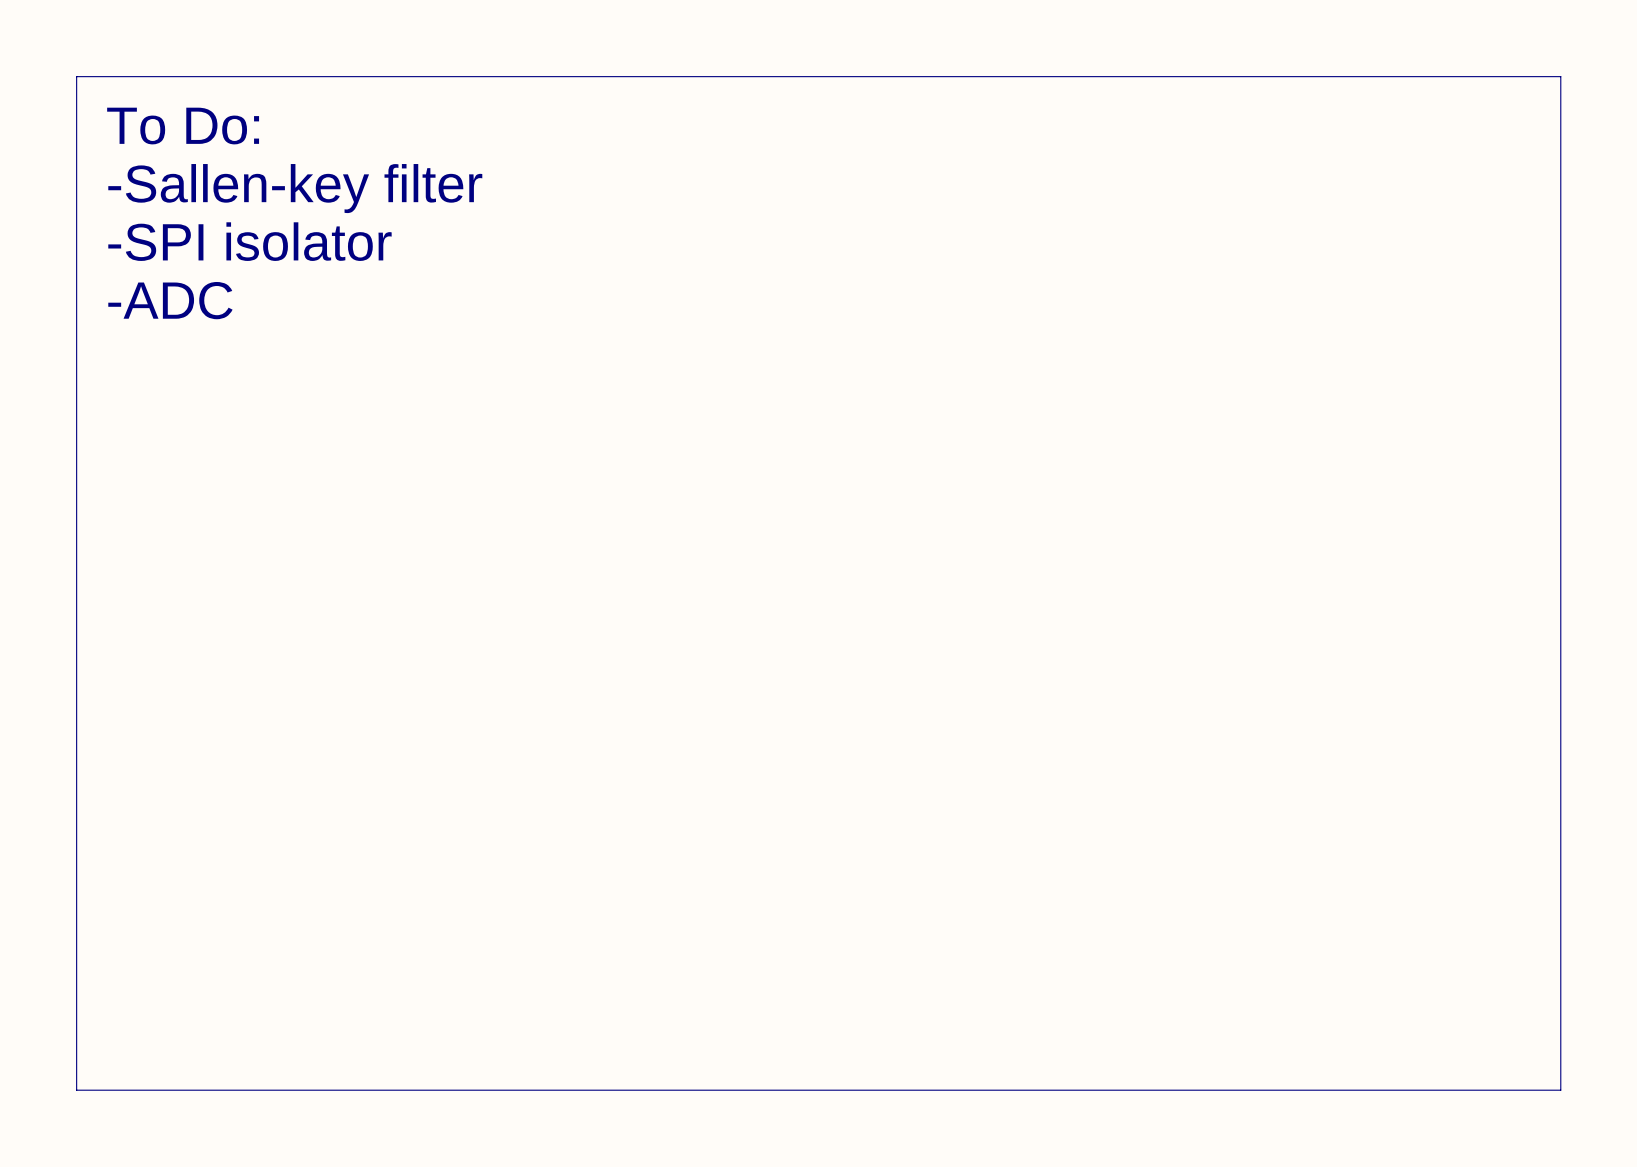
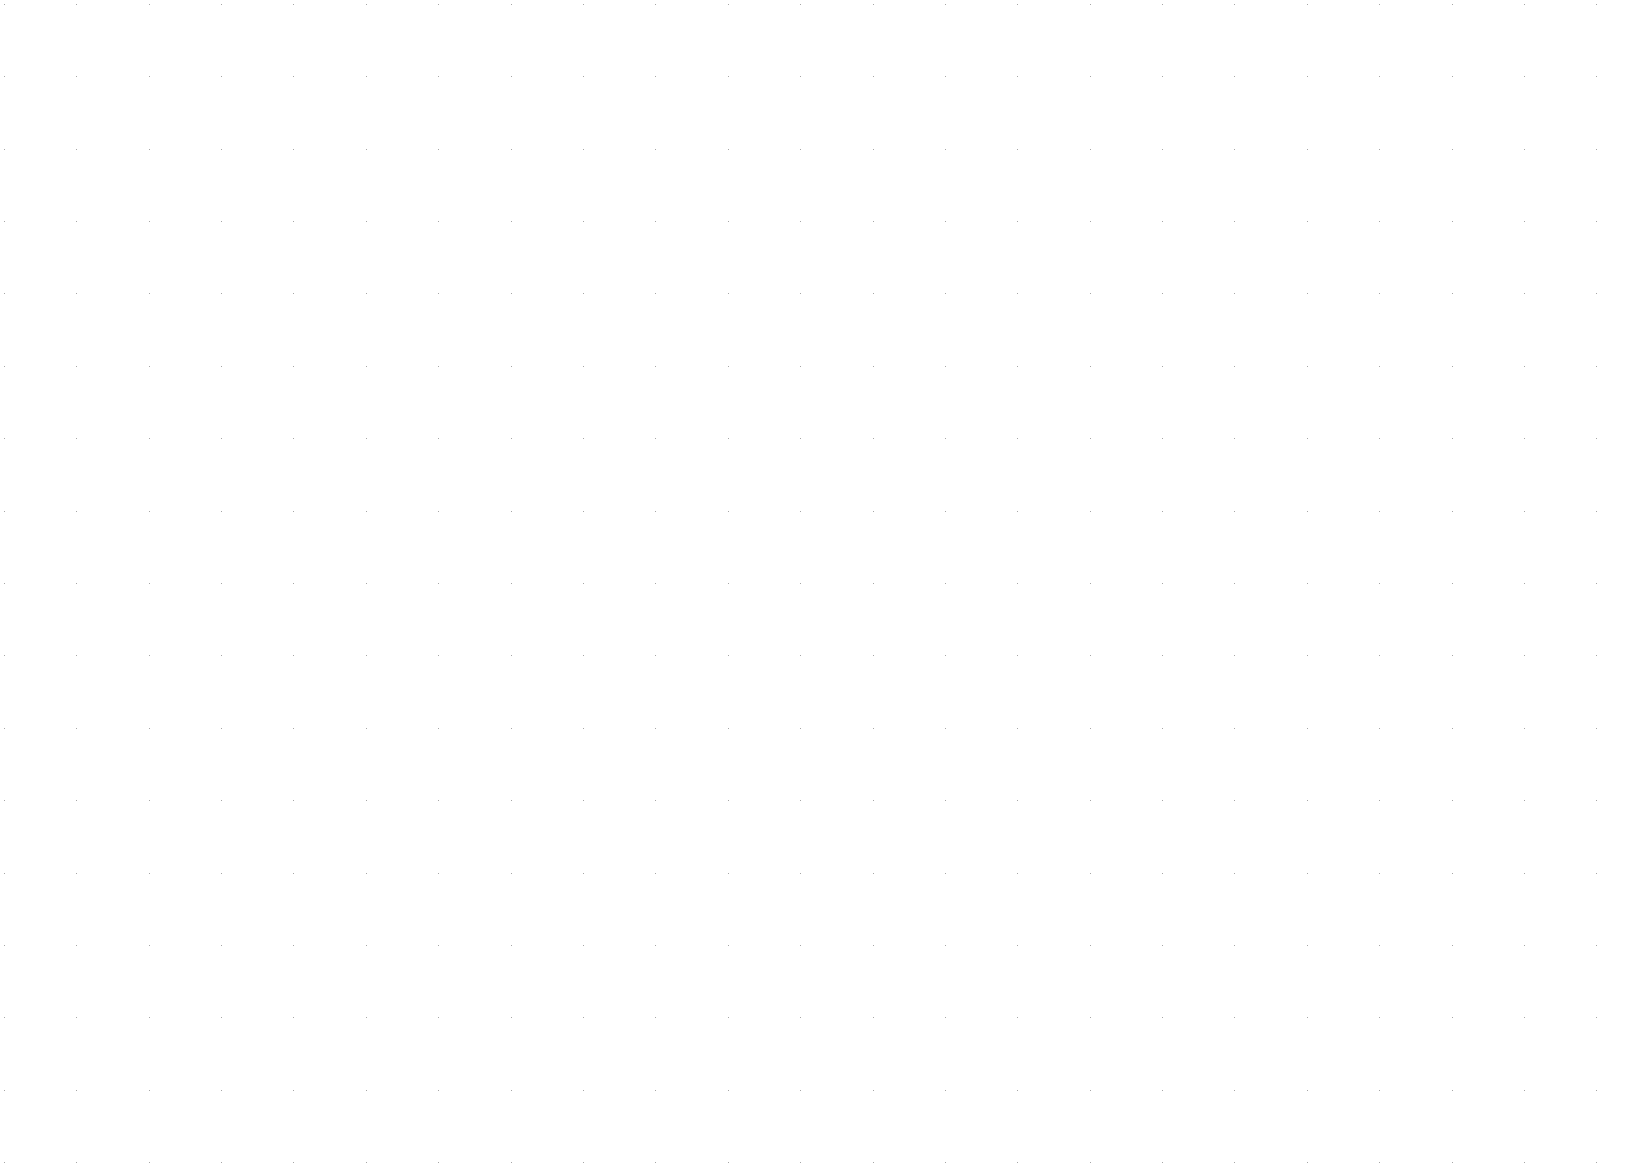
line: (76, 76) (1560, 76) (1560, 1090) (76, 1090) (76, 76) -> none
text: To Do: (183, 126) -> none
text: -Sallen-key filter (295, 188) -> none
text: -SPI isolator (249, 241) -> none
text: -ADC (170, 300) -> none

